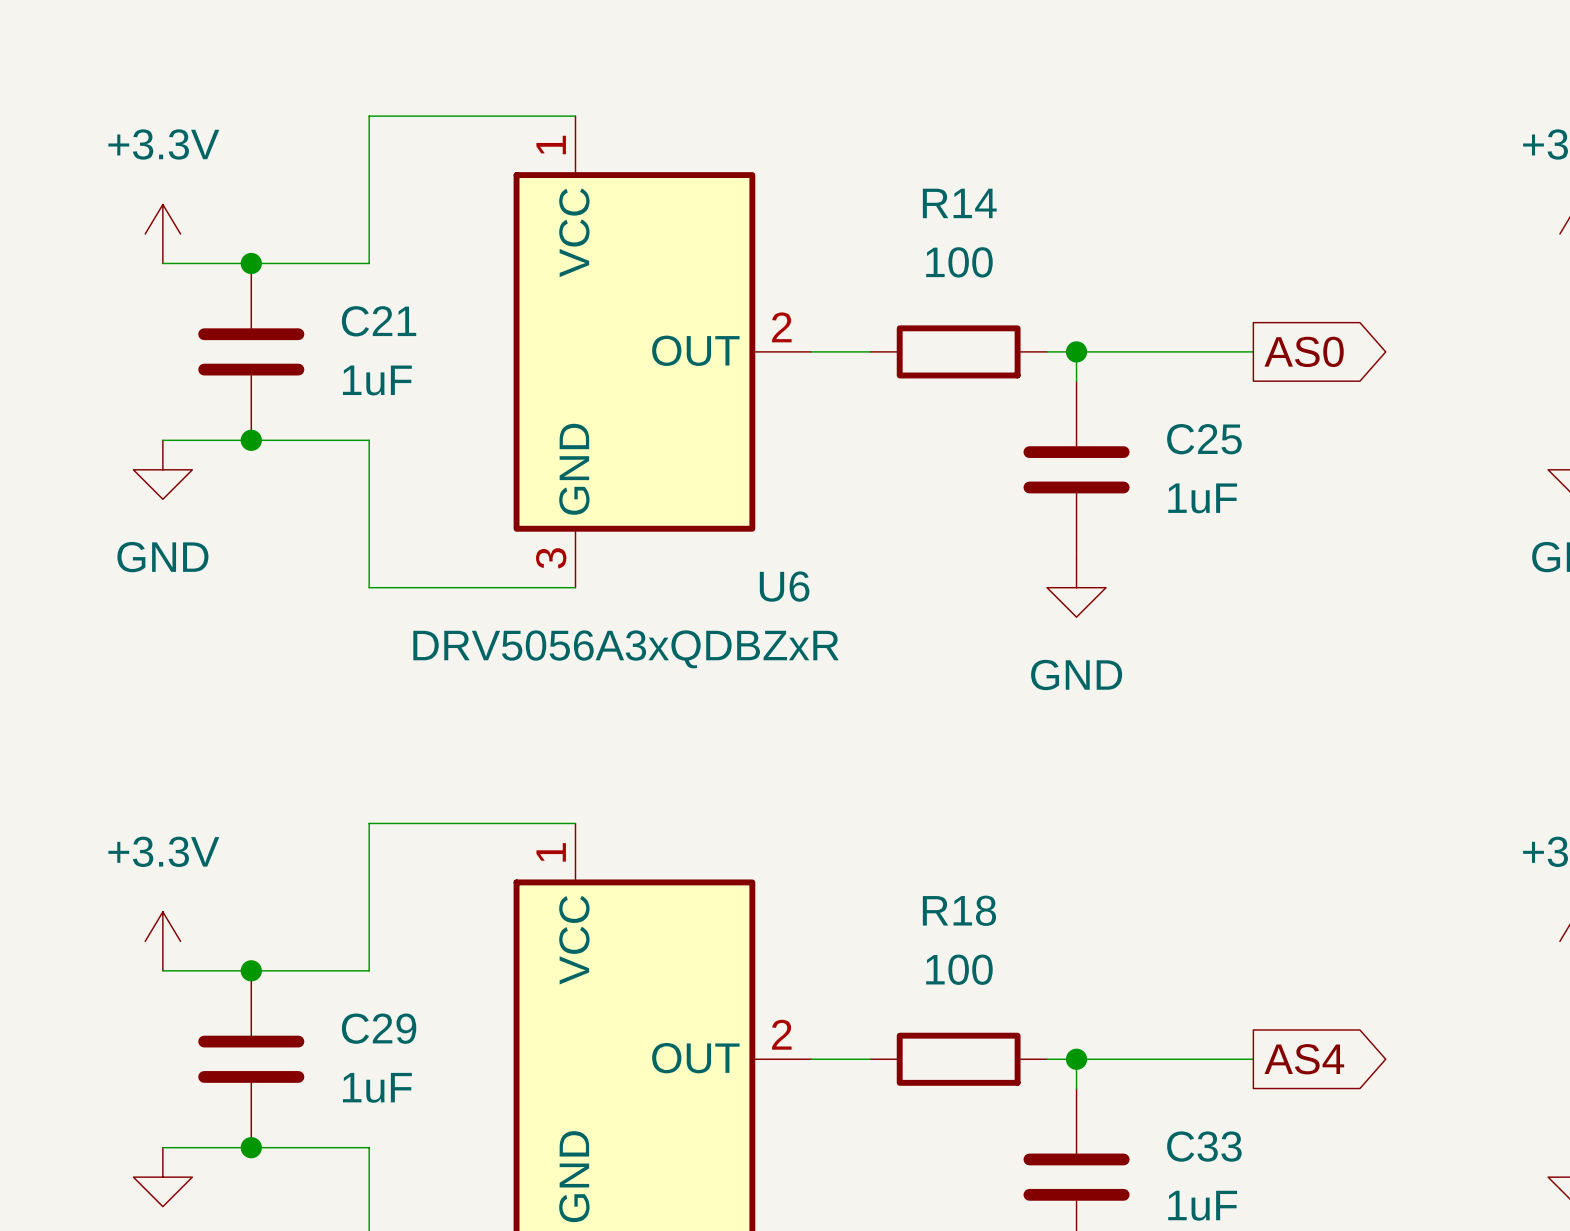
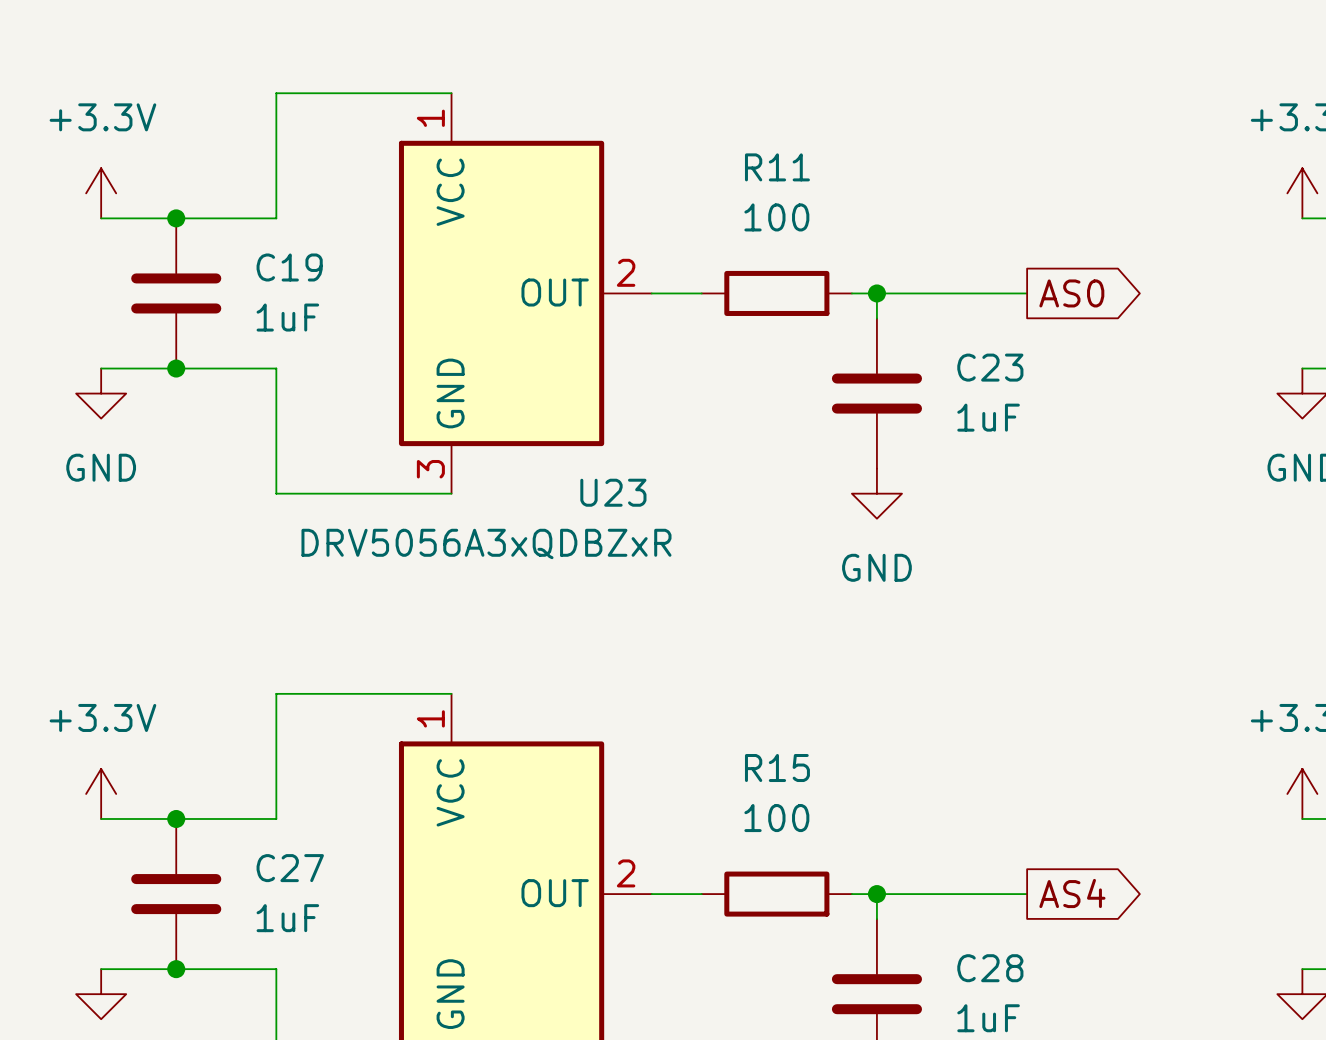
R14 name: R14 (959, 203) -> R11 (777, 167)
C21 name: C21 (379, 321) -> C19 (289, 267)
C25 name: C25 (1204, 439) -> C23 (990, 367)
U6 name: U6 (784, 586) -> U23 (613, 492)
R18 name: R18 (959, 910) -> R15 (777, 768)
C29 name: C29 (379, 1028) -> C27 (290, 868)
C33 name: C33 (1204, 1146) -> C28 (990, 968)

